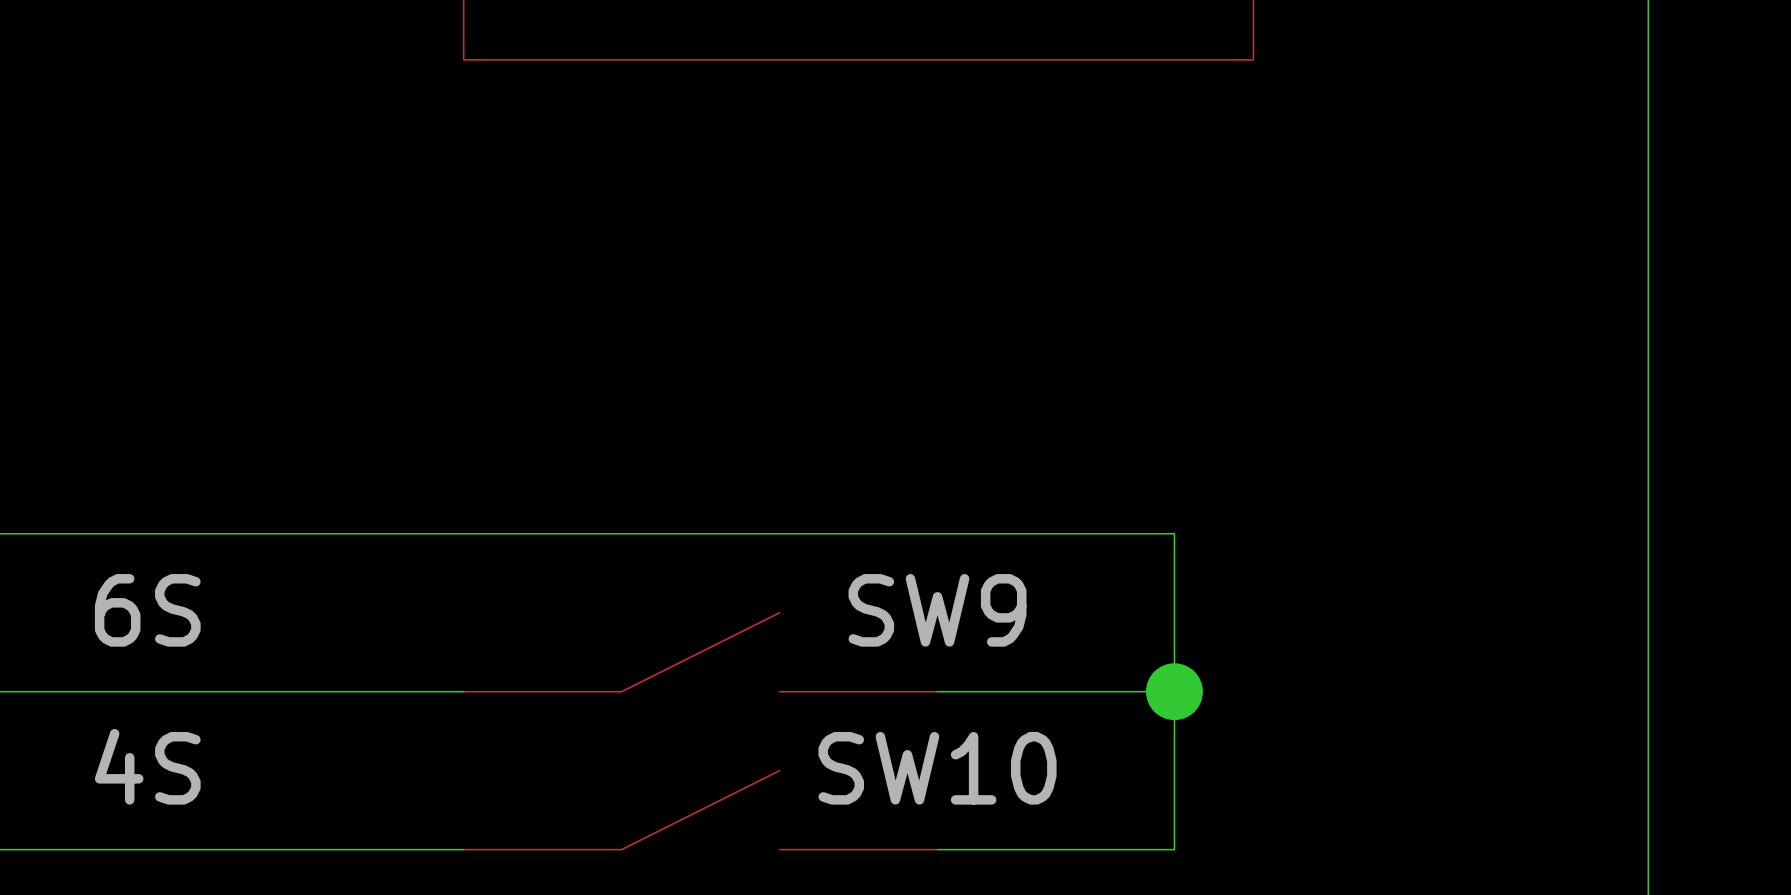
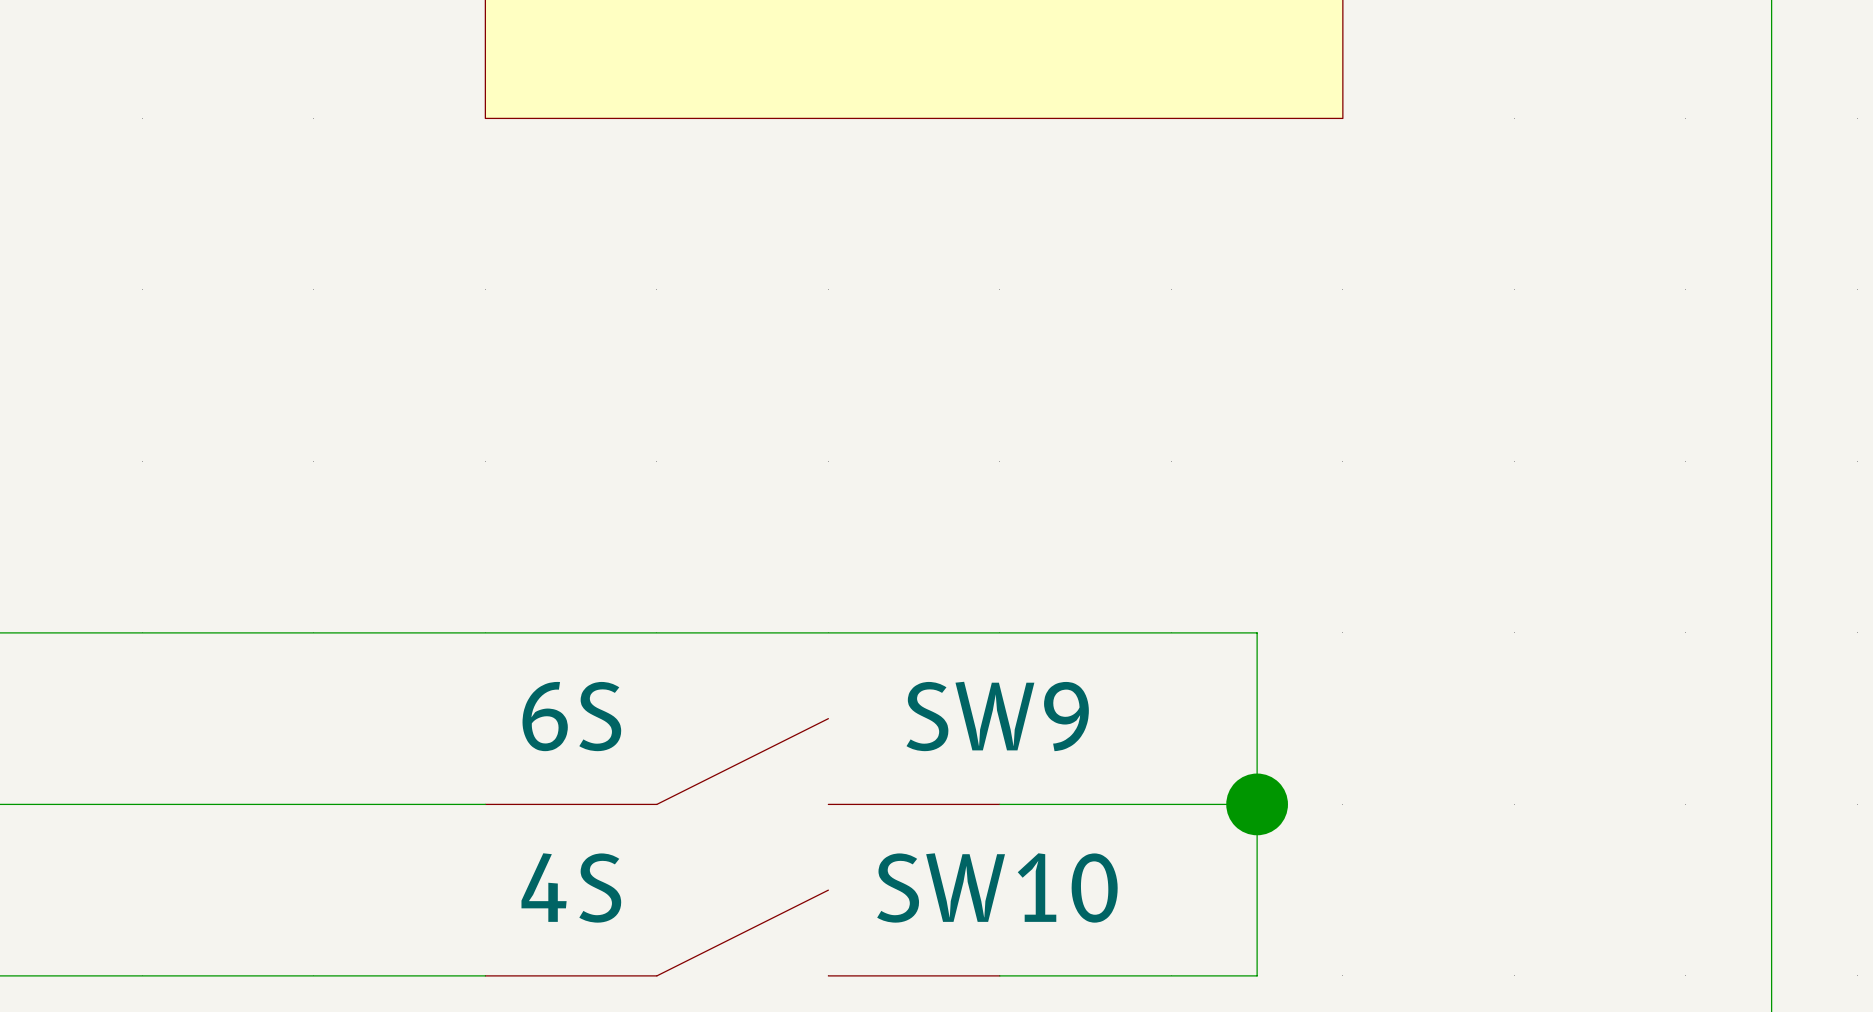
SW9 value position: 6S (147, 610) -> 6S (571, 716)
SW10 value position: 4S (147, 766) -> 4S (571, 887)

